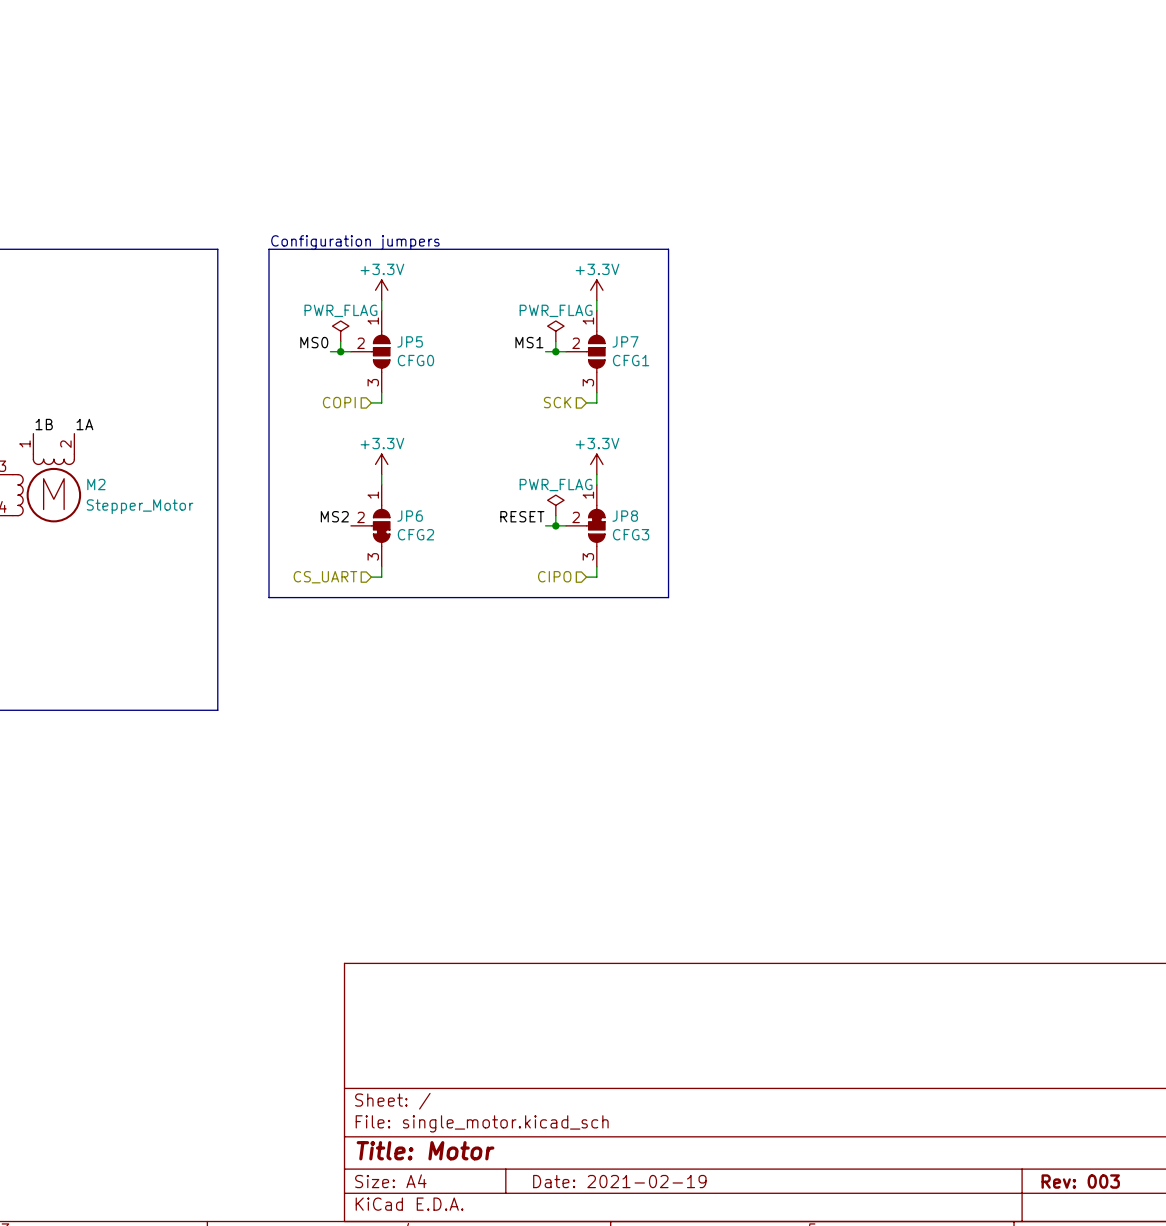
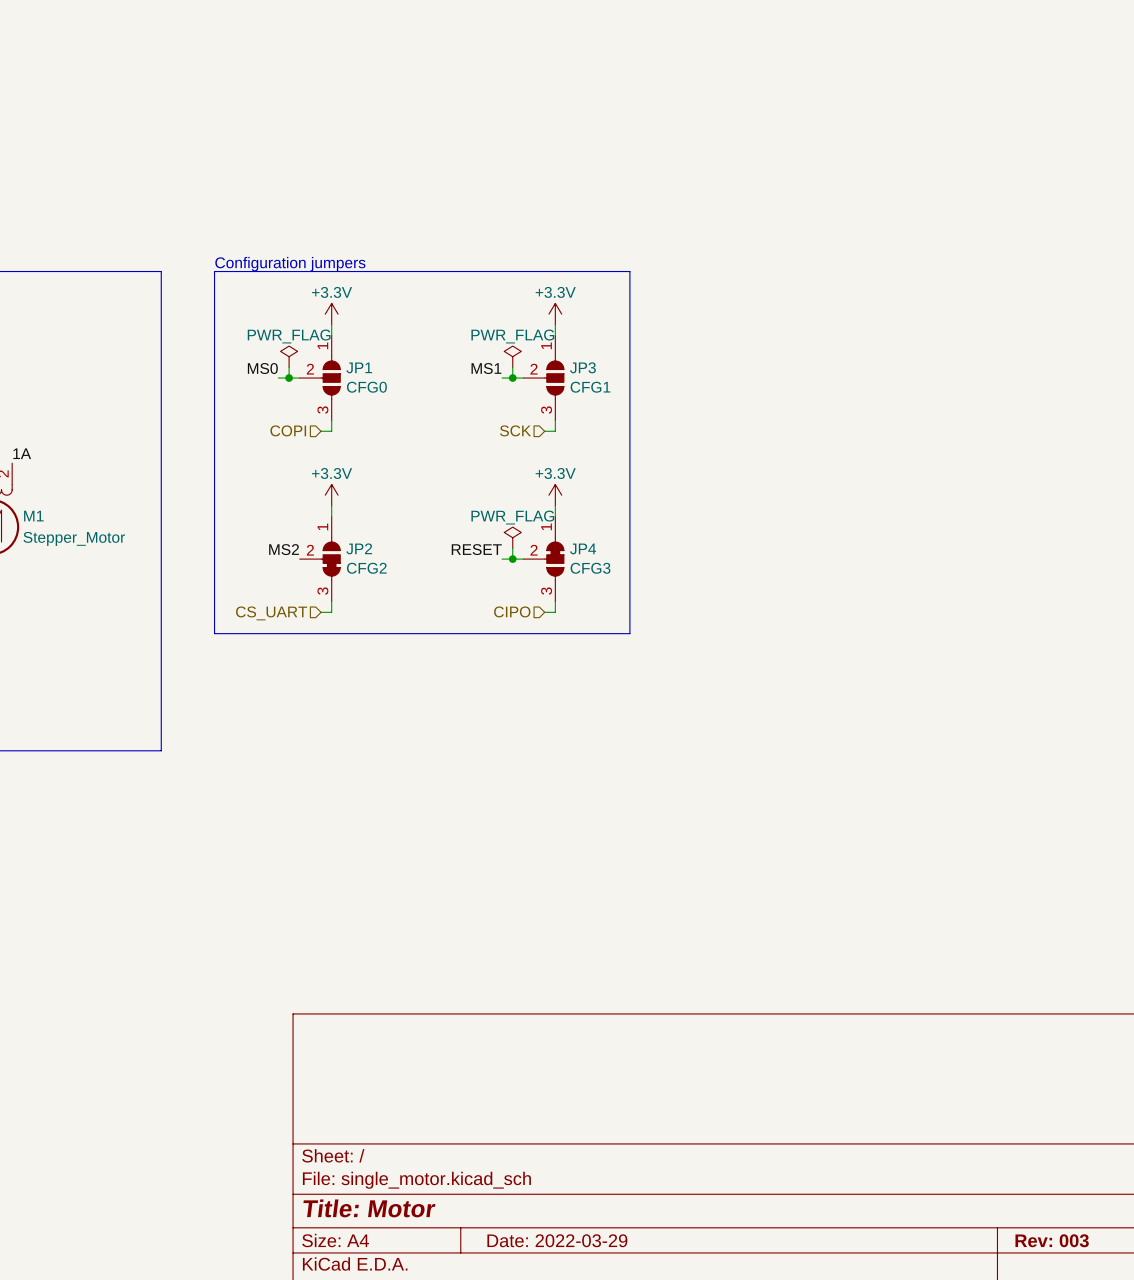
JP5 name: JP5 (410, 341) -> JP1 (359, 367)
JP7 name: JP7 (625, 341) -> JP3 (582, 367)
M2 name: M2 (96, 484) -> M1 (33, 516)
JP6 name: JP6 (410, 516) -> JP2 (359, 548)
JP8 name: JP8 (625, 516) -> JP4 (583, 548)
title block: Date: 2021-02-19 (619, 1181) -> Date: 2022-03-29 (557, 1240)

